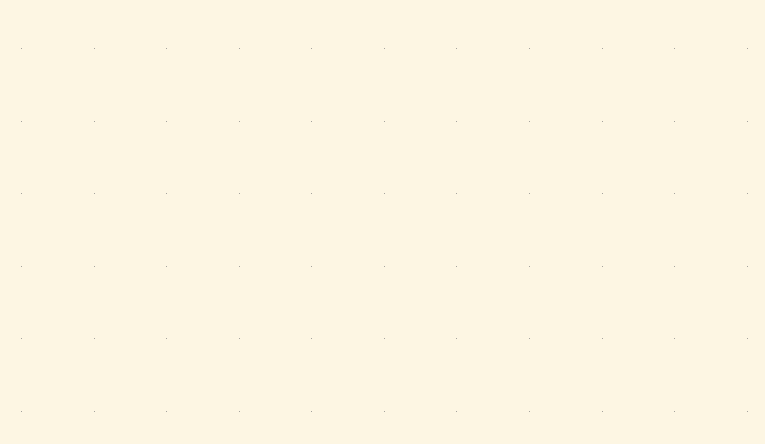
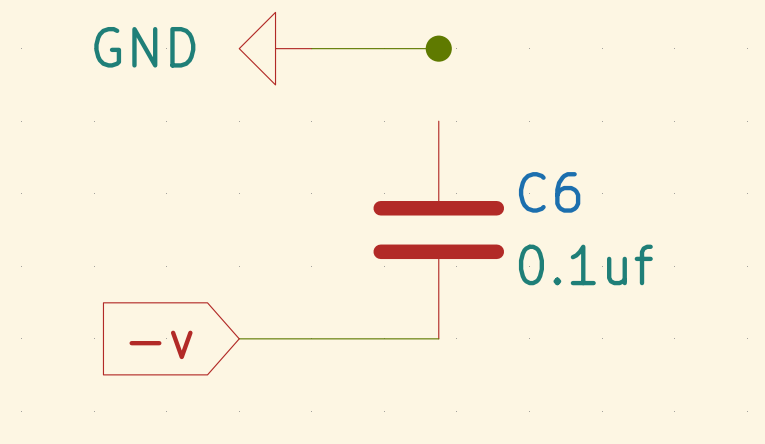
power symbol: none -> GND (275, 48)
wire: none -> (311, 48) (438, 48)
junction: none -> (438, 48)
C6: none -> 0.1uf (438, 230)
wire: none -> (239, 338) (438, 338)
global label: none -> -v (161, 344)

